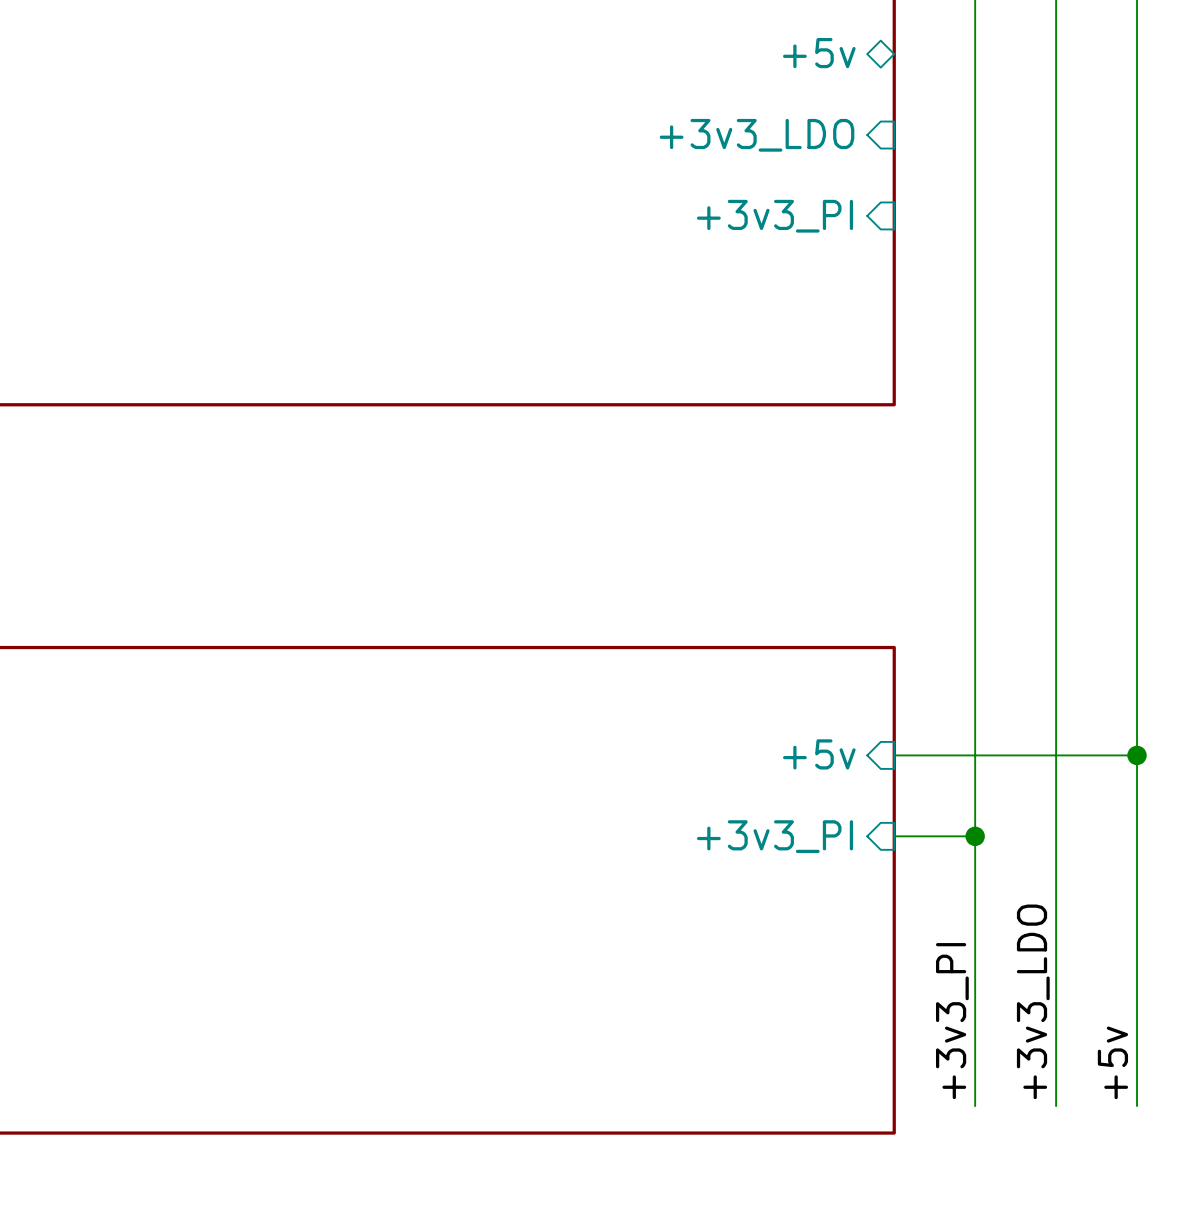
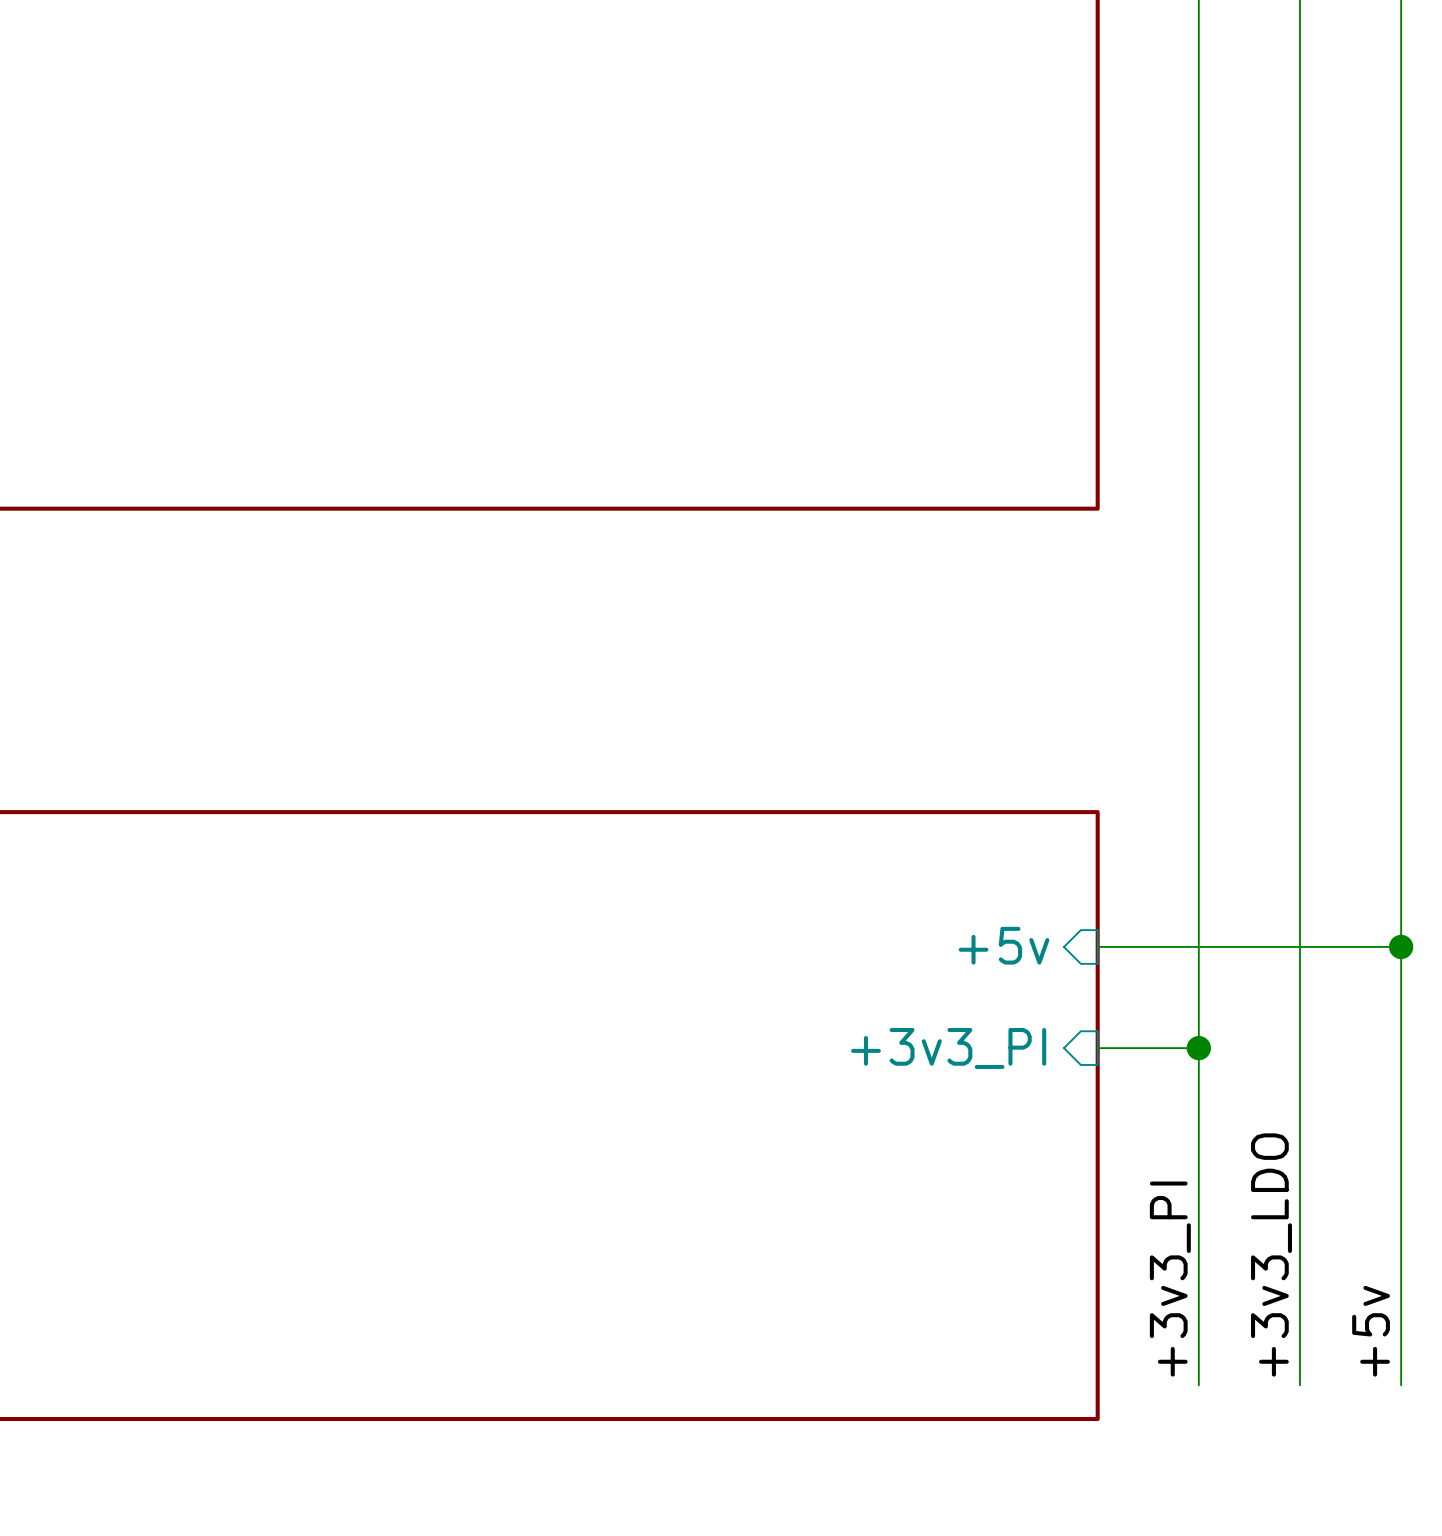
sheet pin: +5v (819, 53) -> none
sheet pin: +3v3_LDO (757, 135) -> none
sheet pin: +3v3_PI (775, 216) -> none

